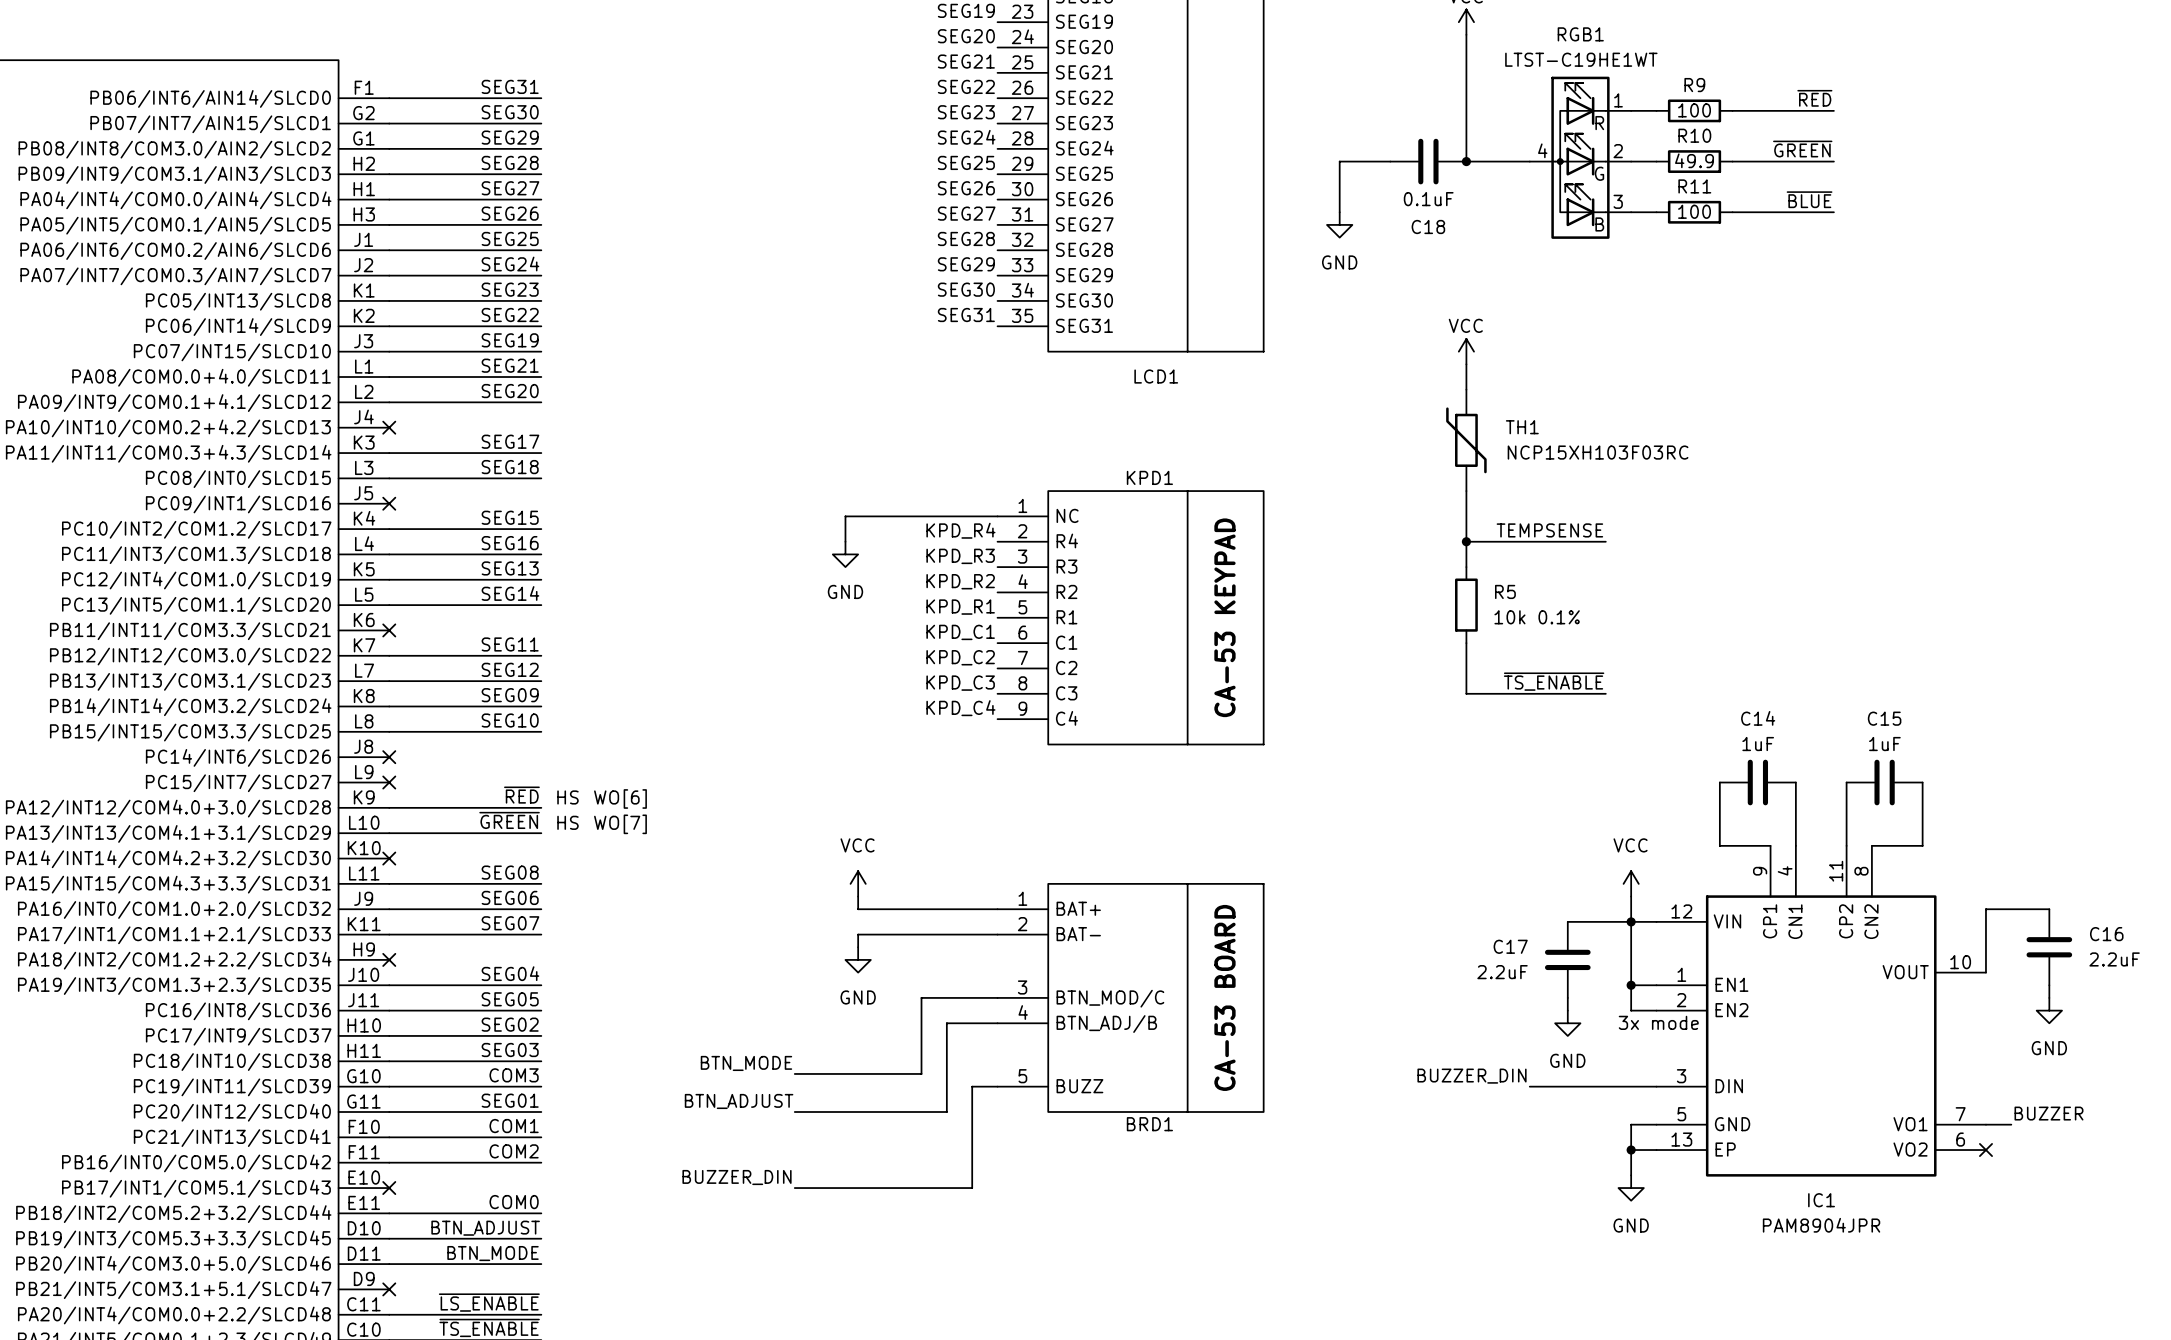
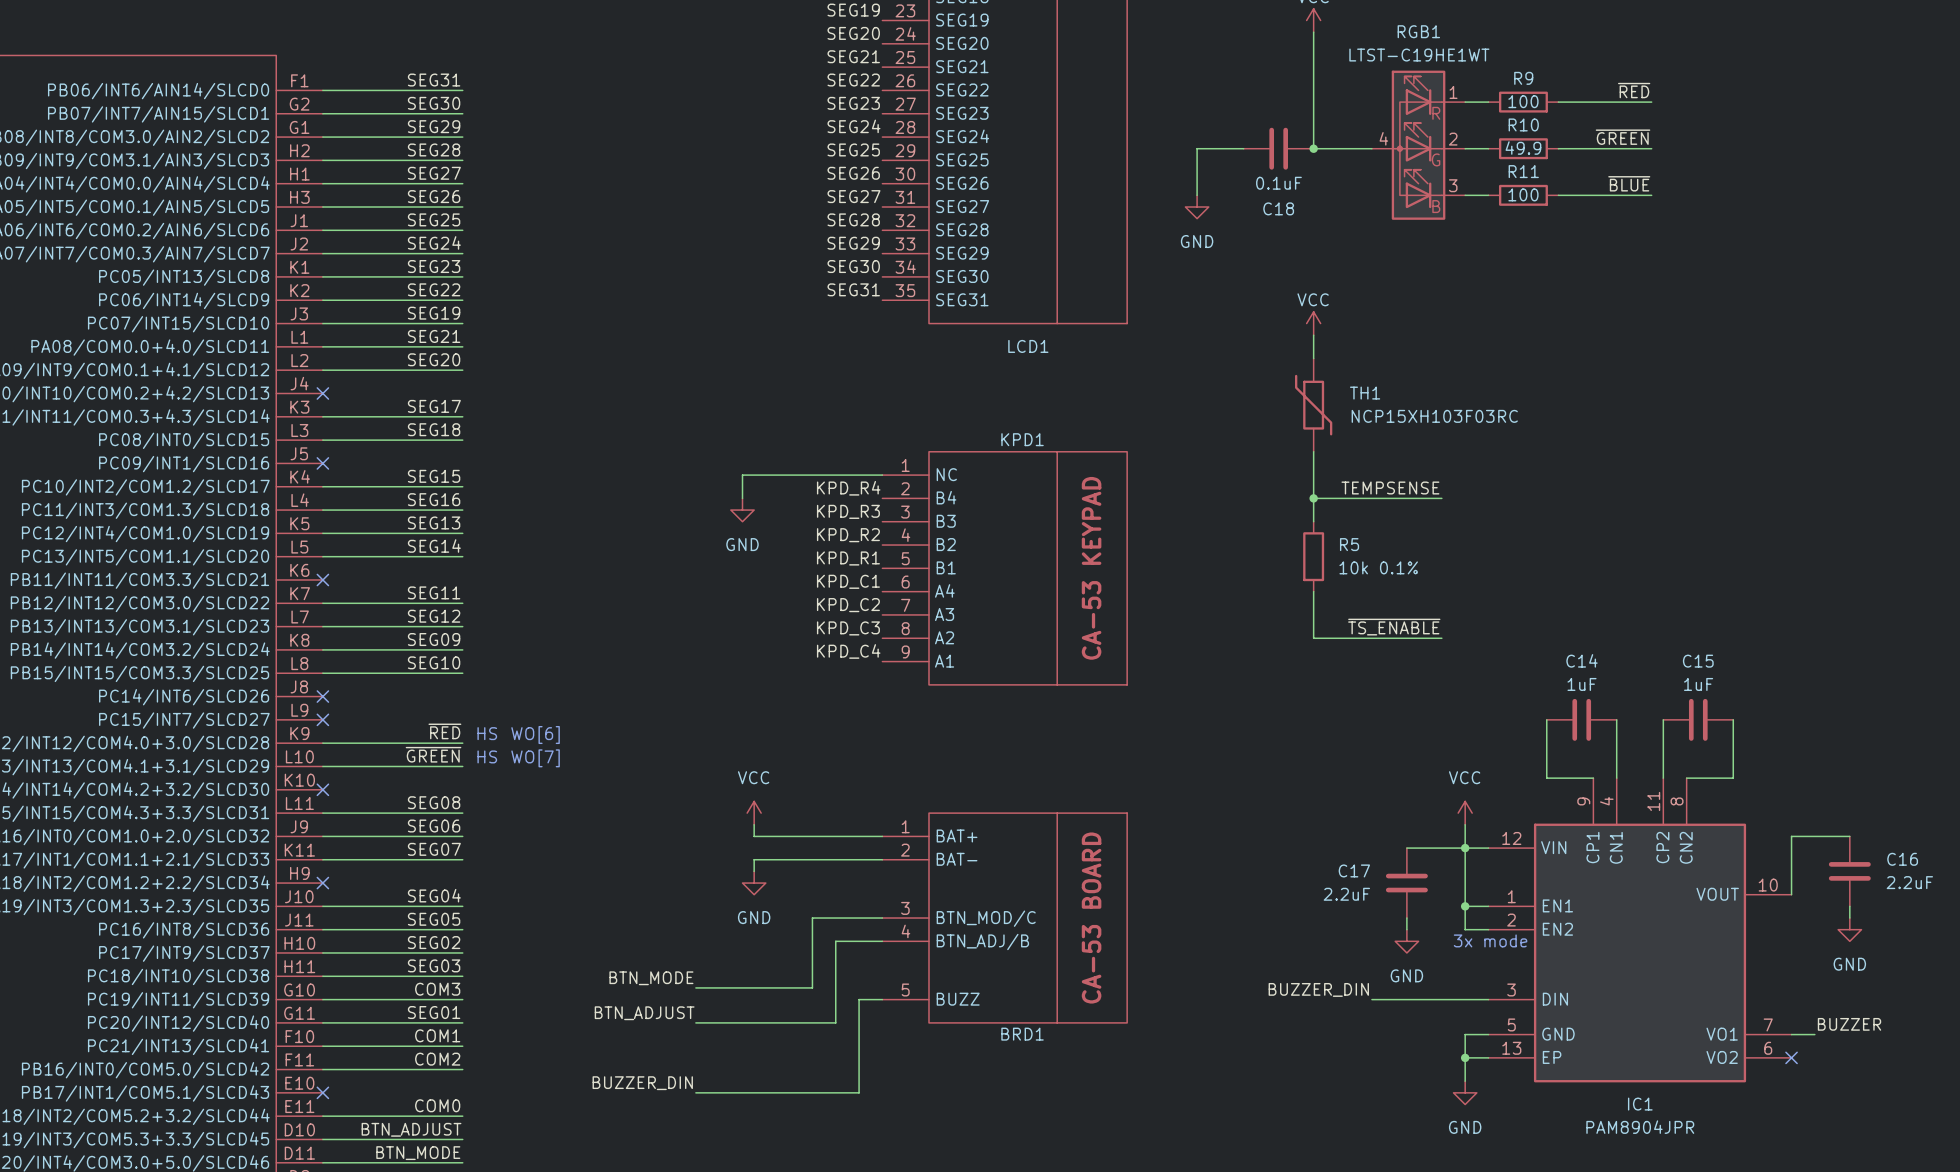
KPD1 pin name: R4 (1067, 540) -> B4 (946, 497)
KPD1 pin name: R3 (1066, 566) -> B3 (946, 521)
KPD1 pin name: R2 (1066, 591) -> B2 (946, 544)
KPD1 pin name: R1 (1066, 617) -> B1 (946, 567)
KPD1 pin name: C1 (1066, 642) -> A4 (944, 590)
KPD1 pin name: C2 (1066, 667) -> A3 (944, 614)
KPD1 pin name: C3 (1066, 693) -> A2 (944, 637)
KPD1 pin name: C4 (1066, 718) -> A1 (944, 661)

